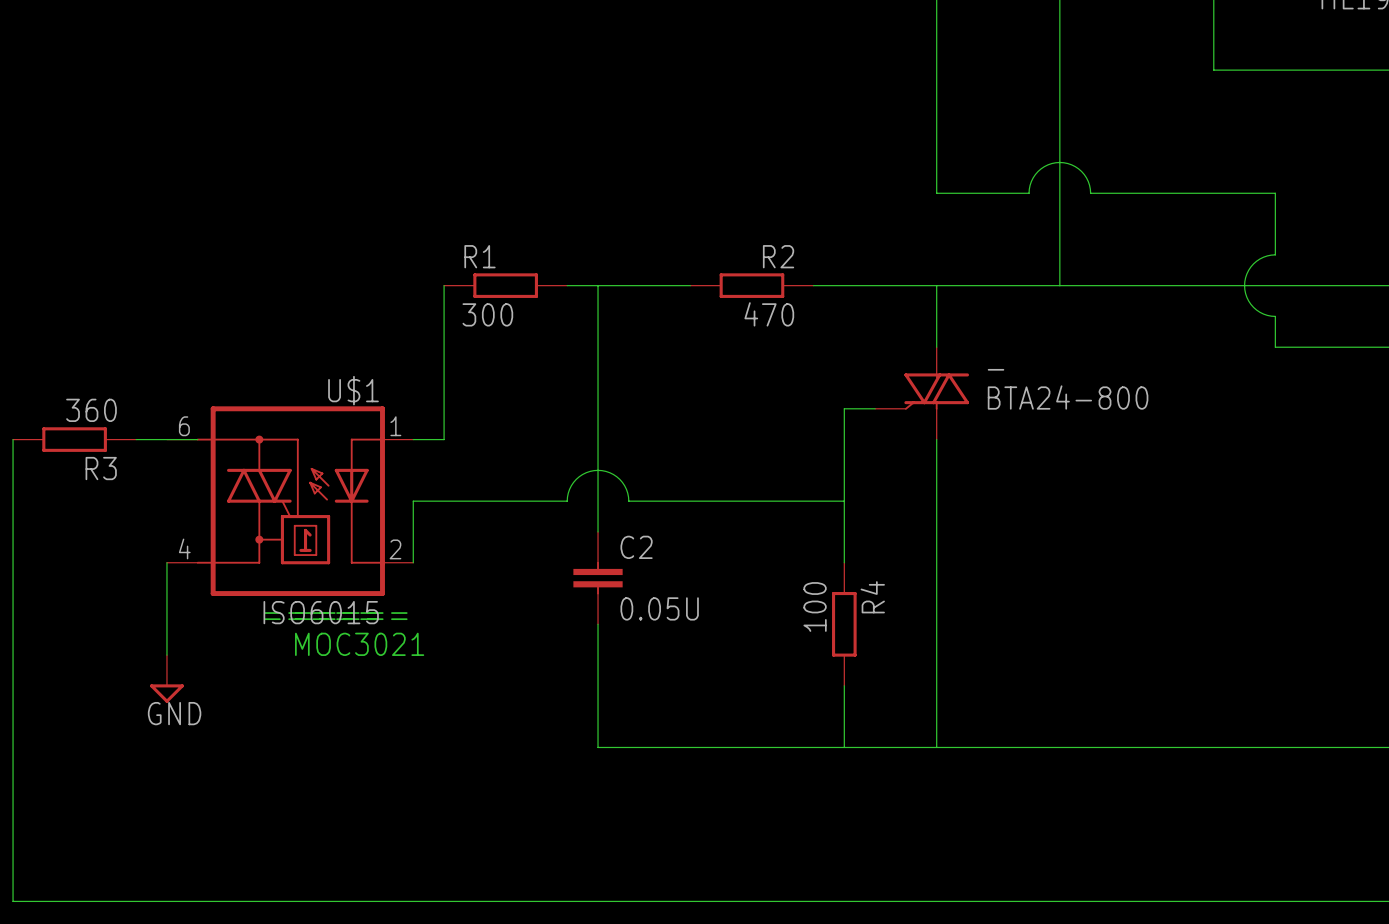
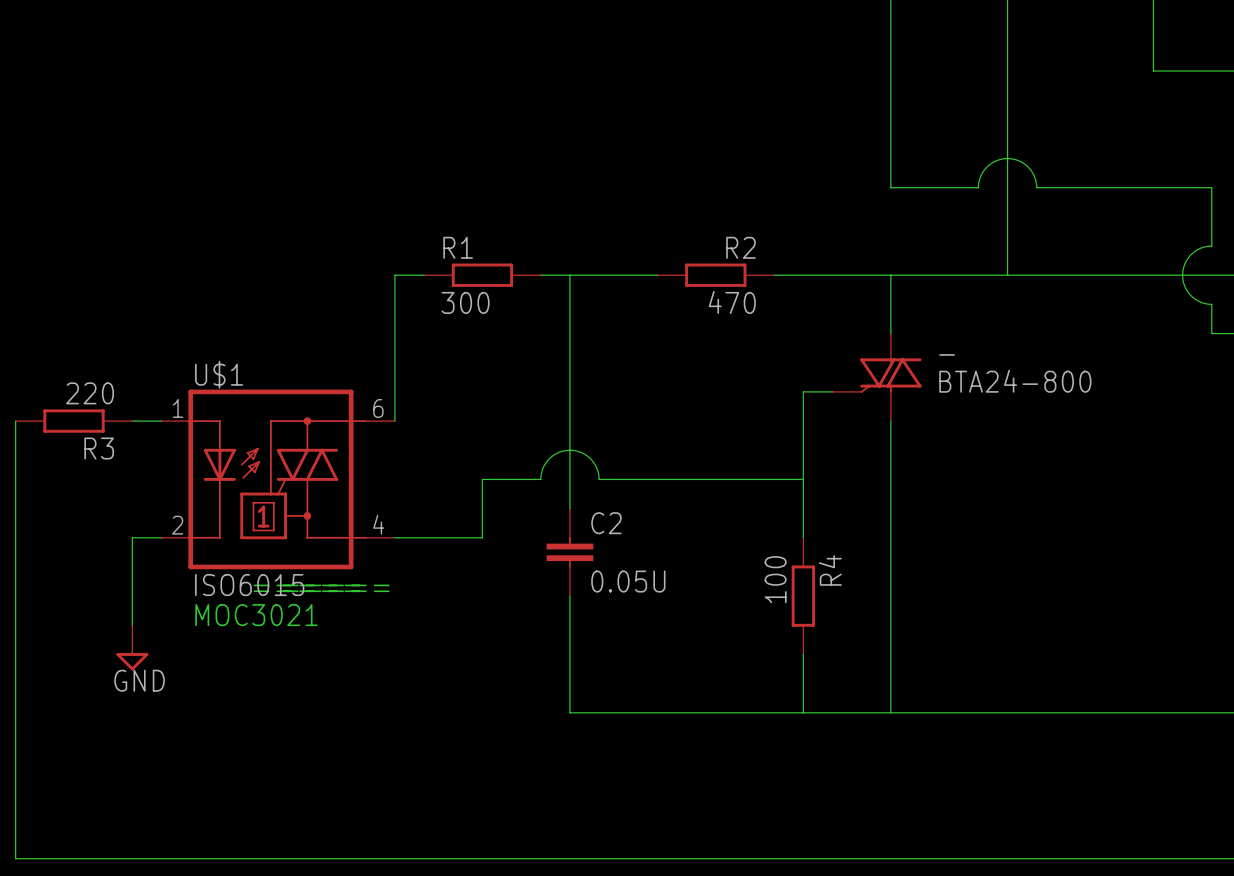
wire: (444, 285) (444, 439) (413, 439) -> (424, 275) (394, 275) (394, 421)
R3 value: 360 (91, 410) -> 220 (90, 393)
U$1 flip: as is (290, 501) -> left-right (277, 479)
wire: (505, 501) (413, 501) (413, 562) -> (482, 479) (482, 537) (394, 537)
wire: (166, 562) (166, 655) -> (161, 537) (132, 537) (132, 625)
text position: MOC3021 (359, 644) -> MOC3021 (256, 615)
power symbol position: GND (166, 678) -> GND (132, 647)

